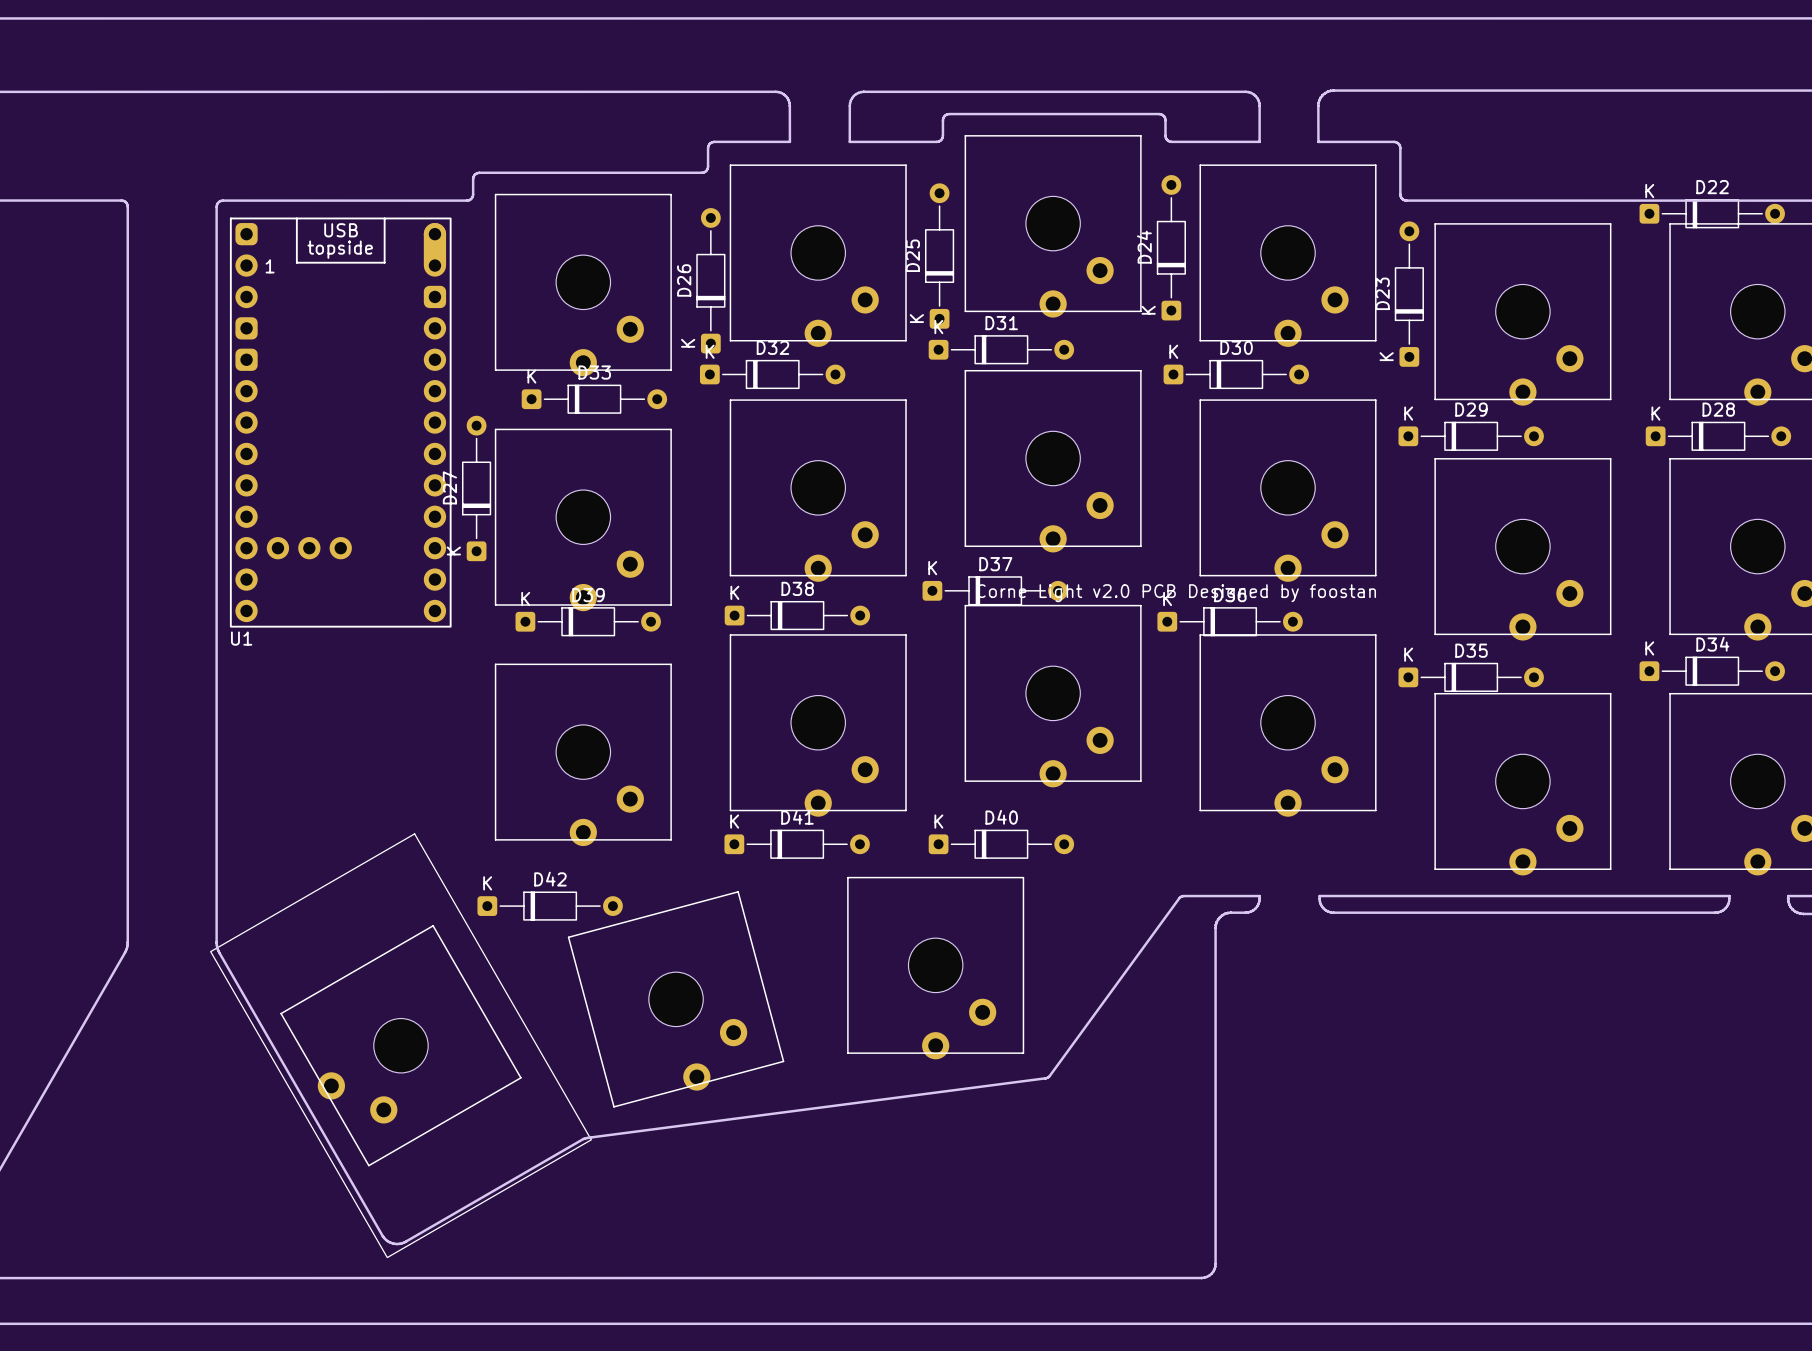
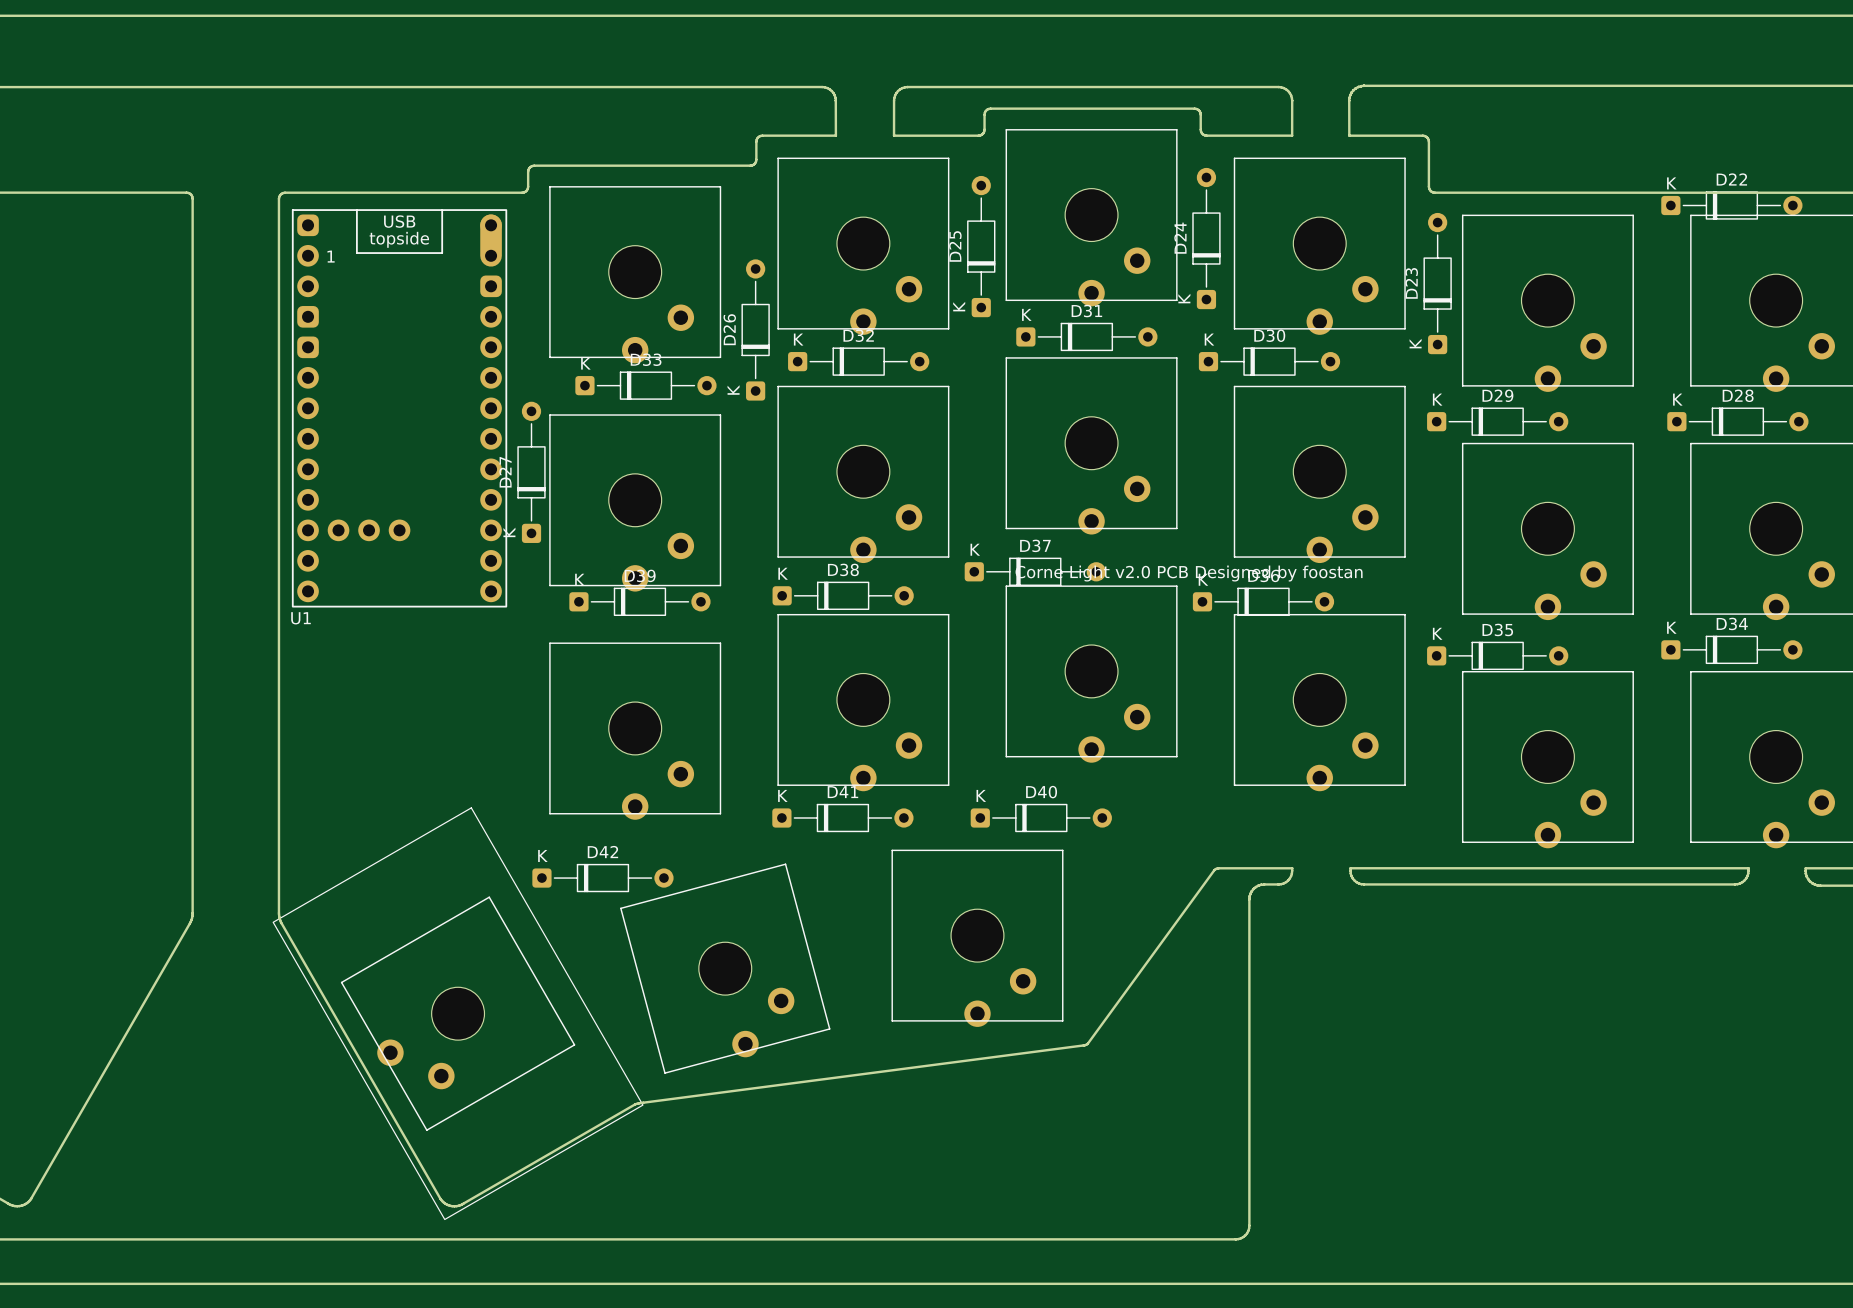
D26 position: (710, 280) -> (755, 329)
D31 position: (1001, 349) -> (1086, 336)
D32 position: (772, 374) -> (858, 361)

